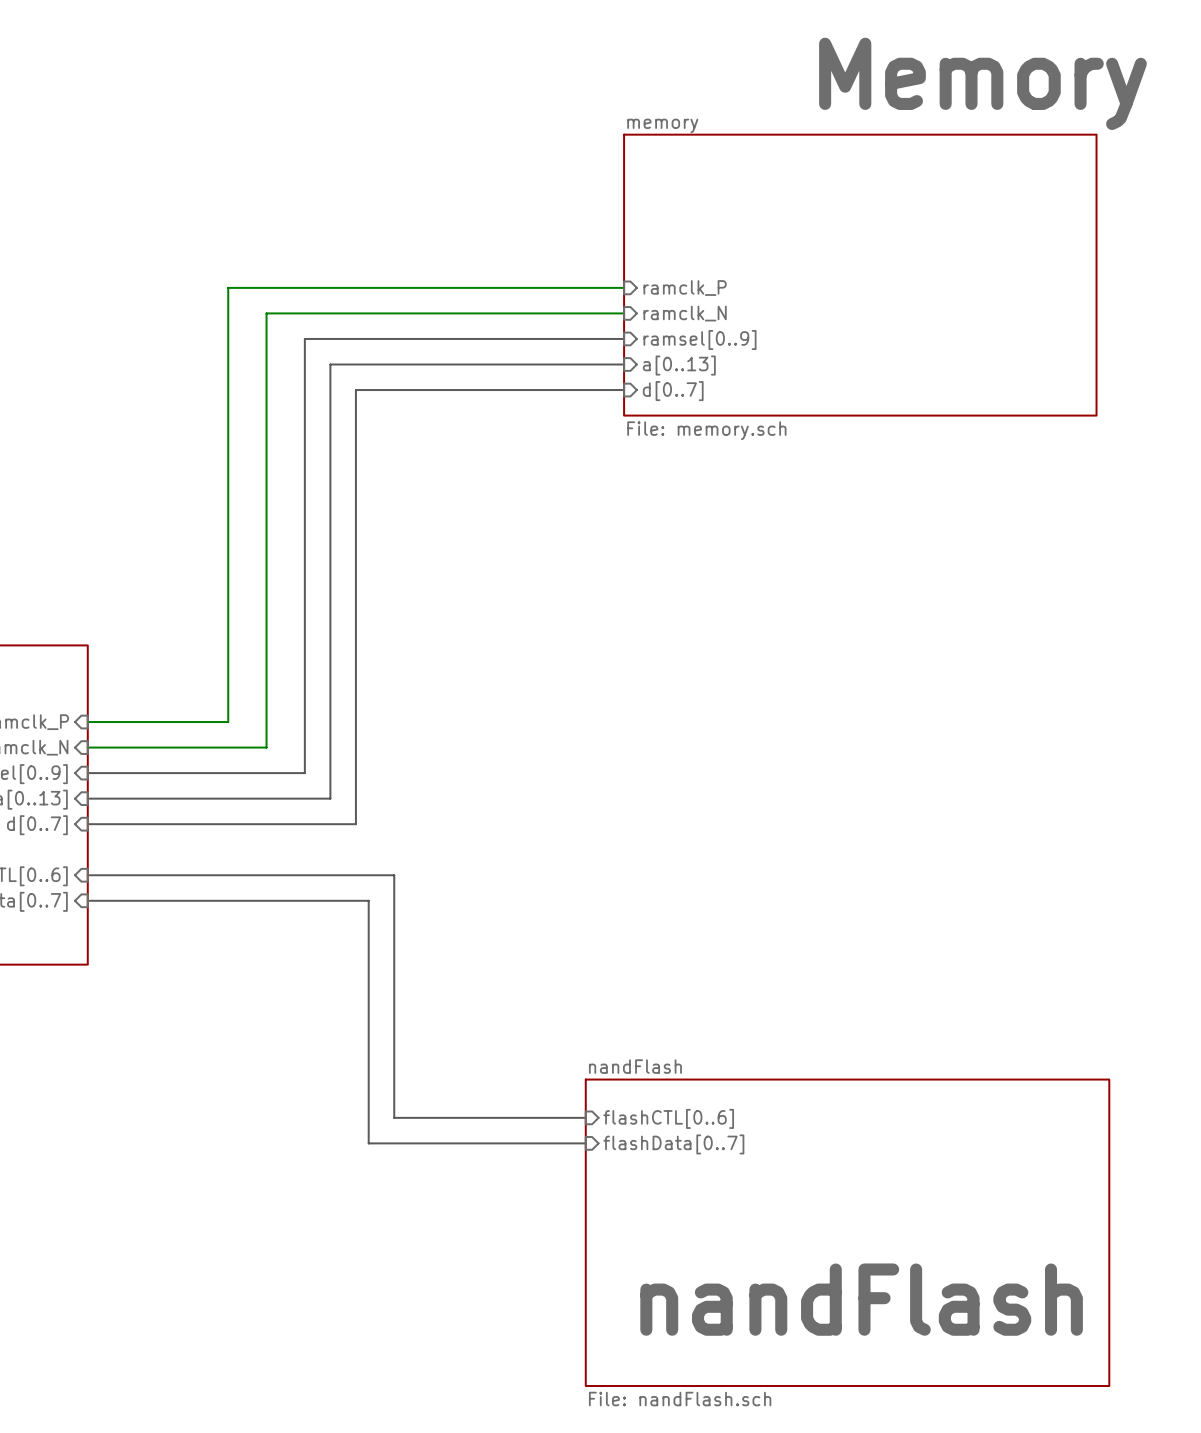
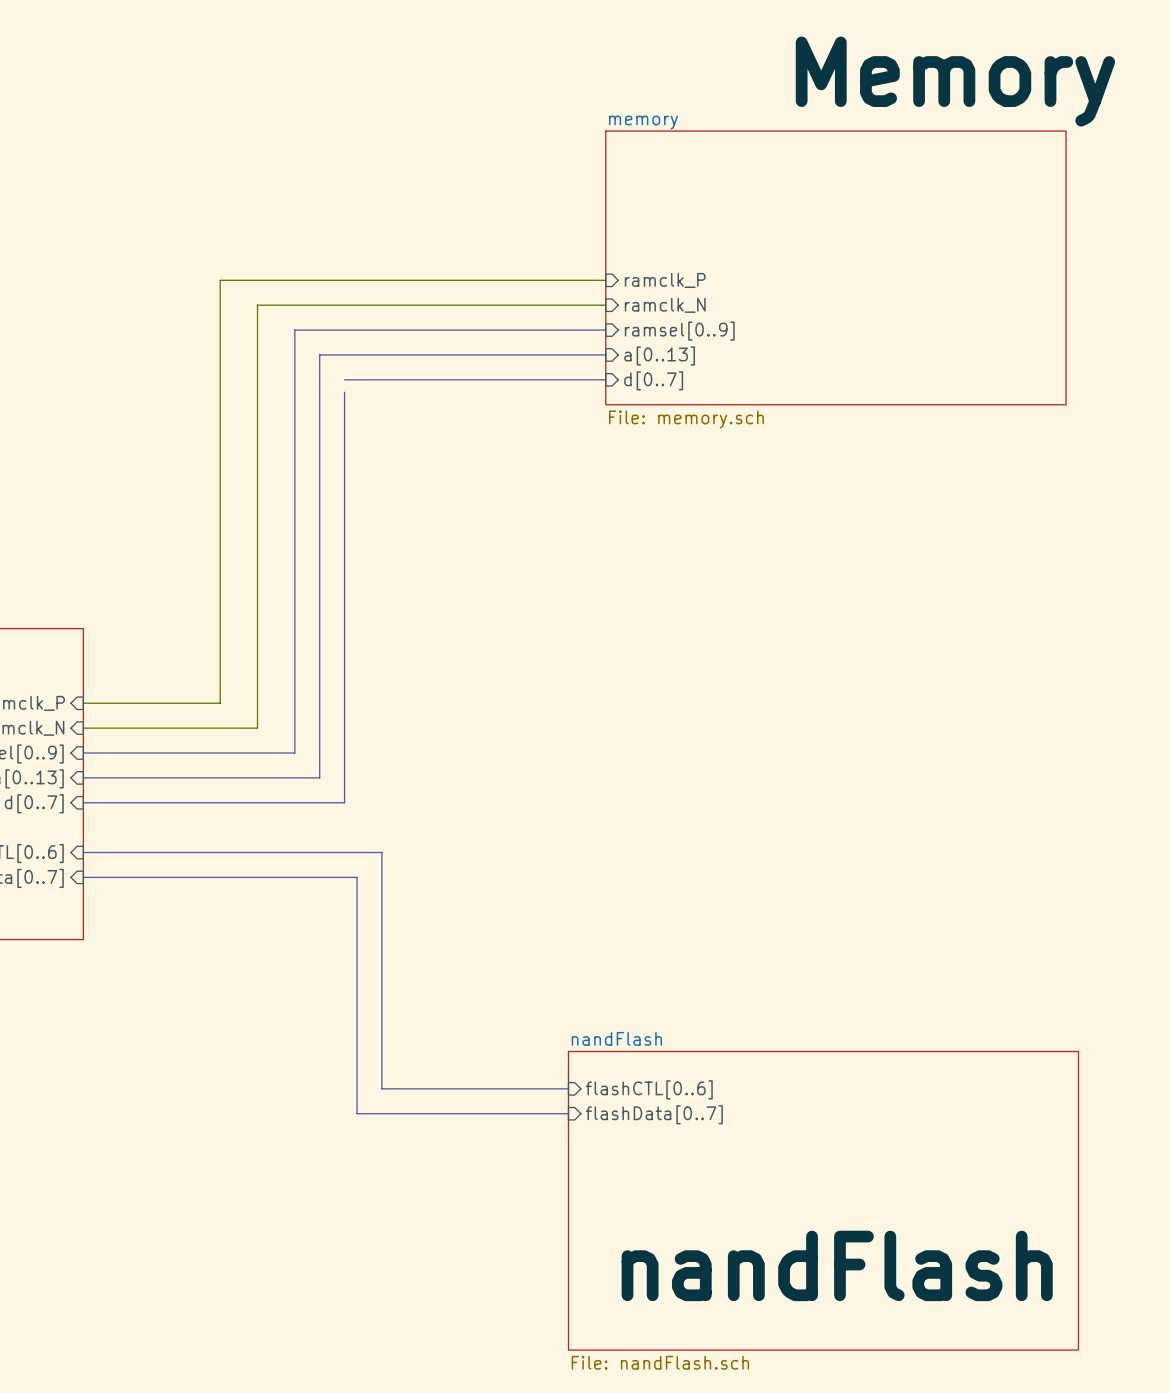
bus: (355, 390) (355, 402) -> none

